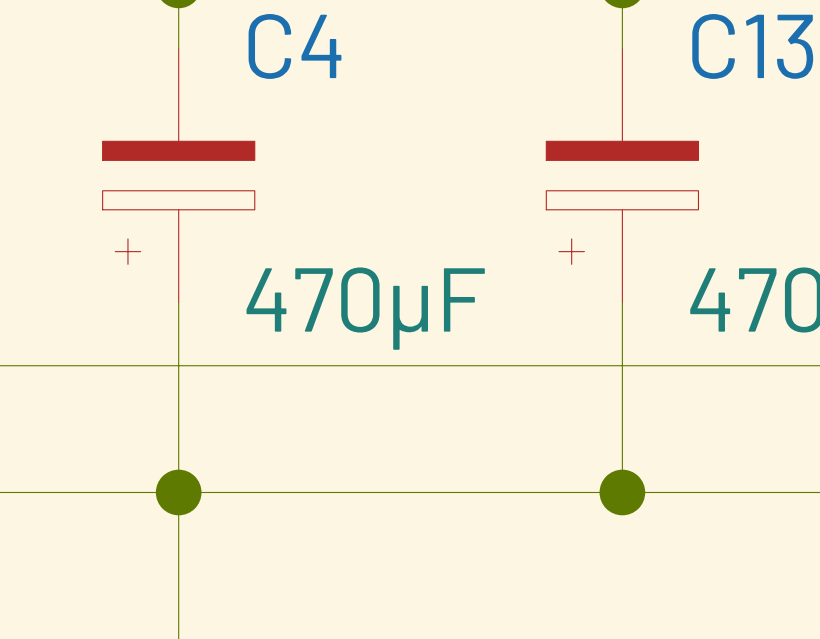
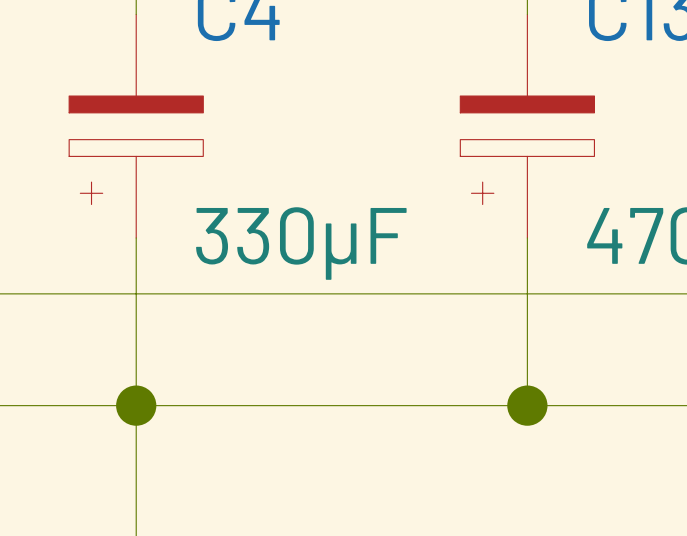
C4 value: 470μF (365, 308) -> 330μF (301, 243)

